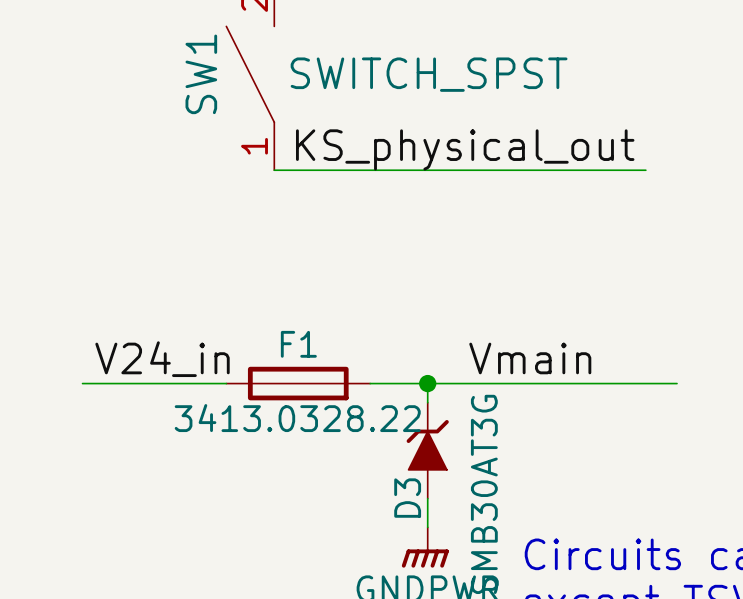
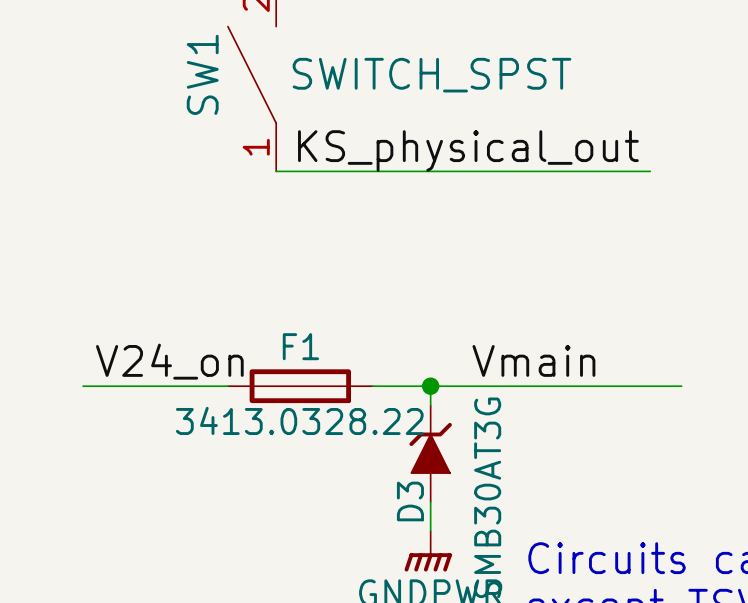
label: V24_in (162, 359) -> V24_on (169, 361)

